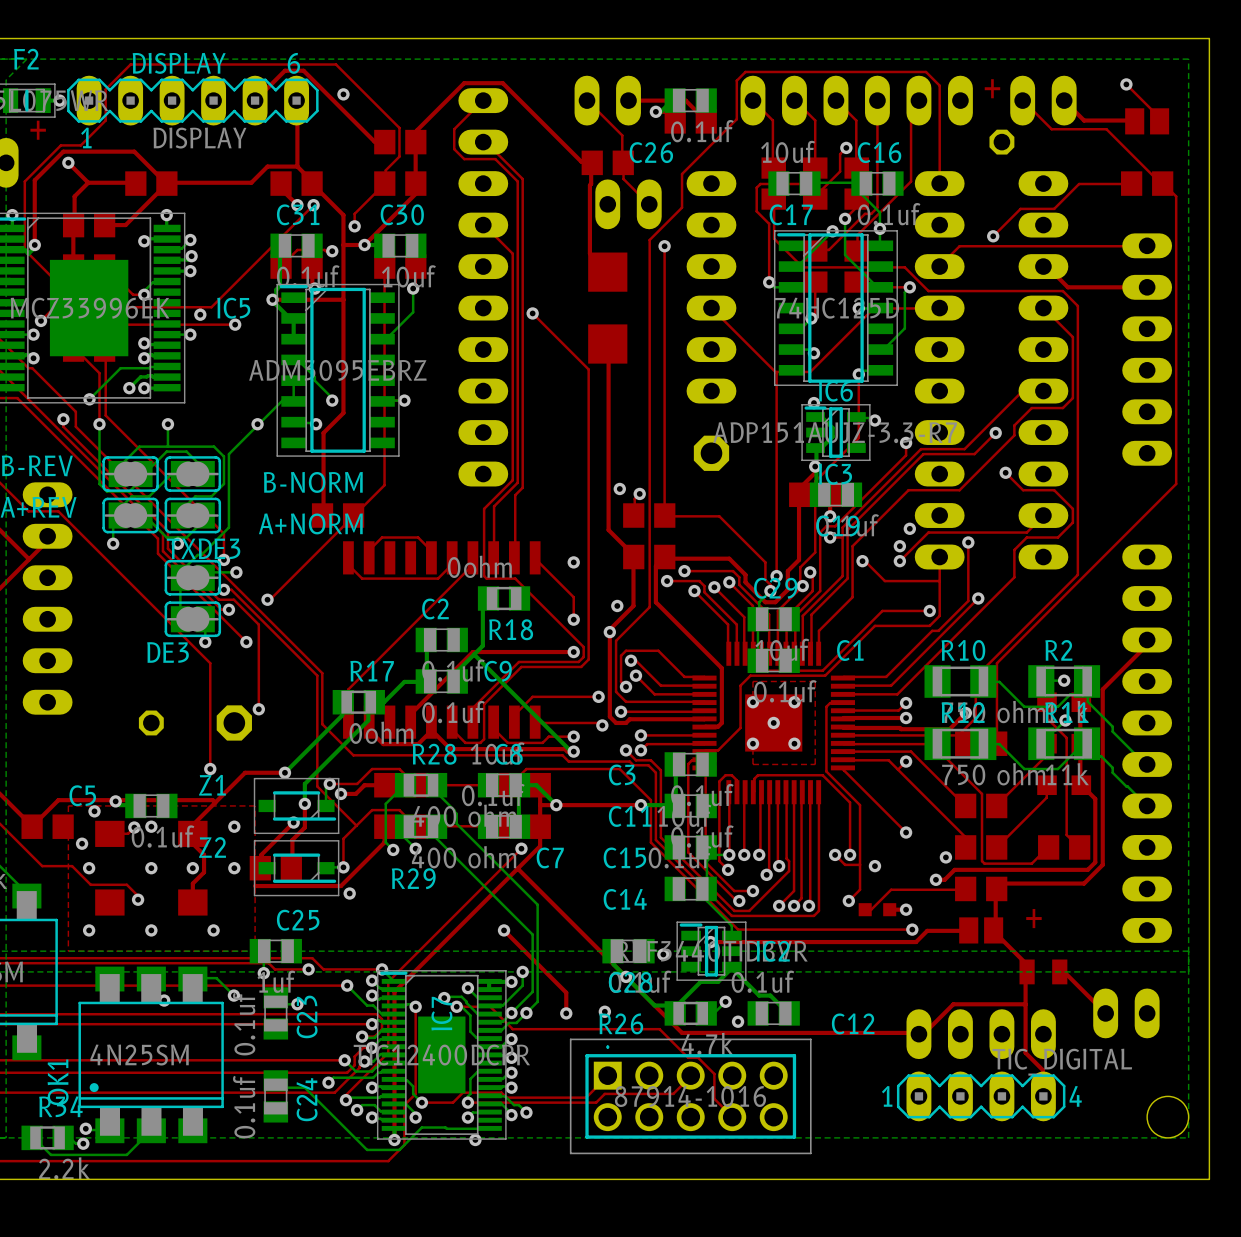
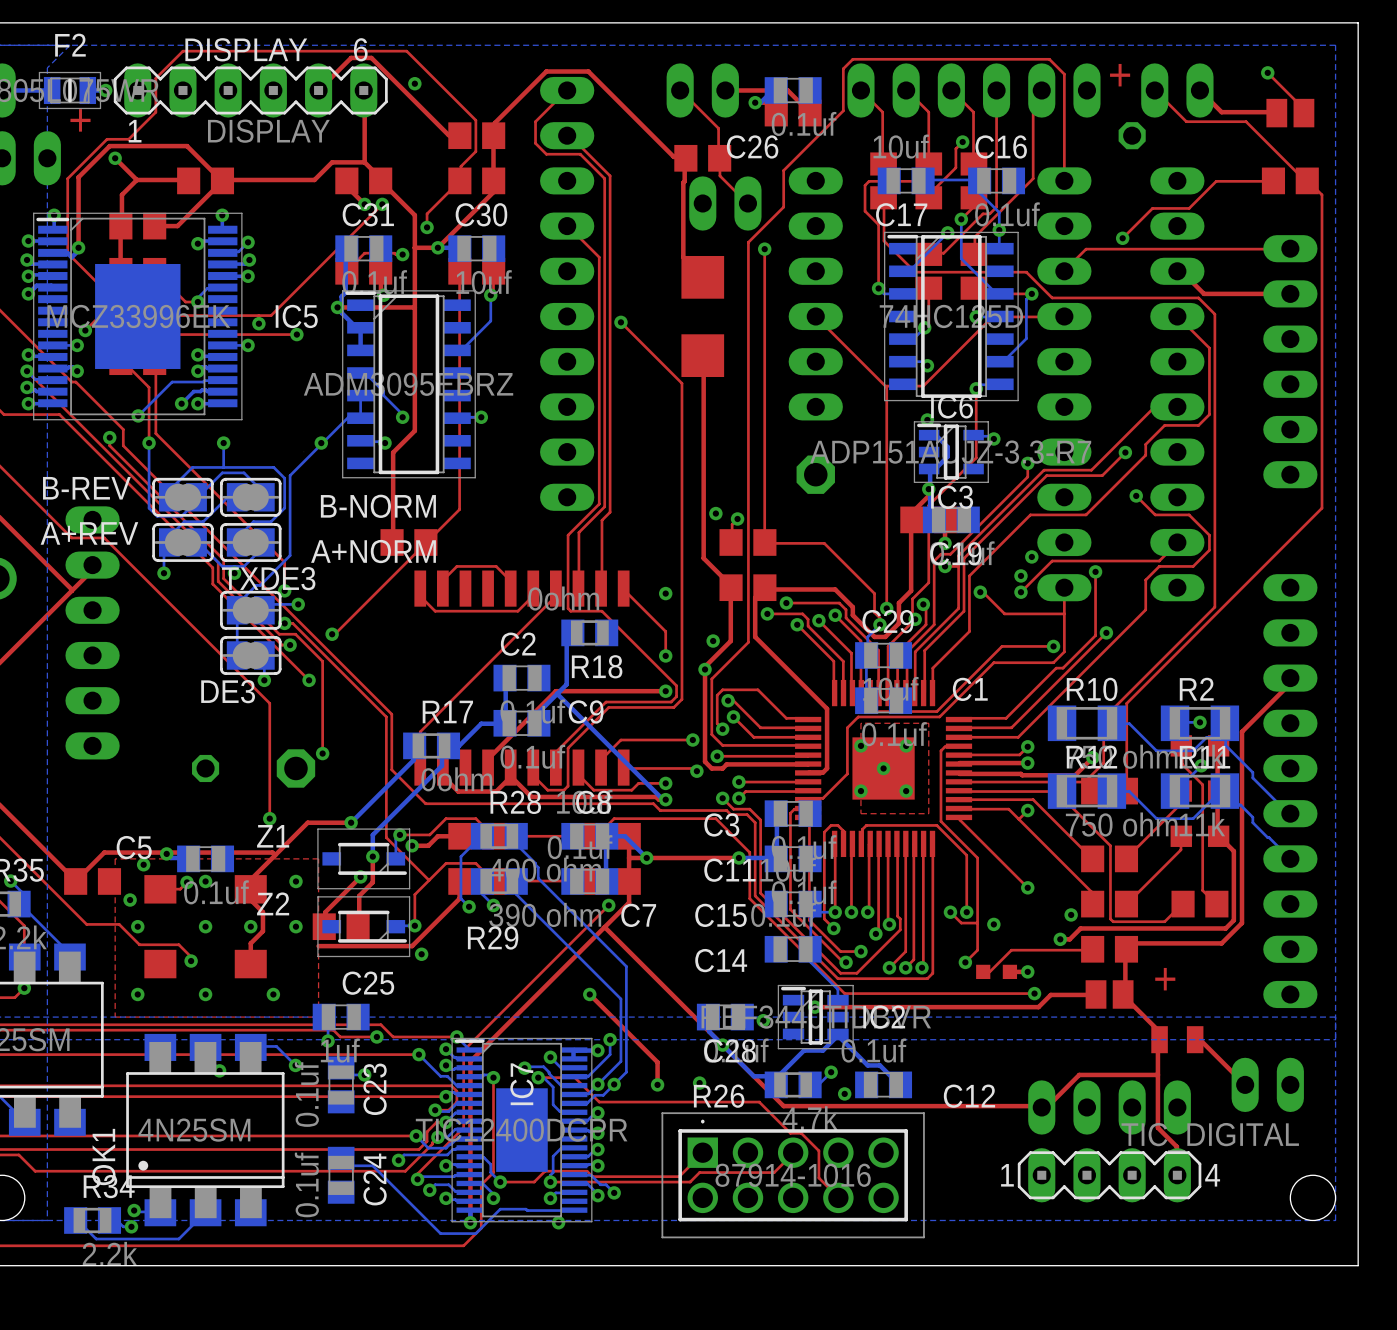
R29 value: 400 ohm (464, 857) -> 390 ohm (545, 914)

